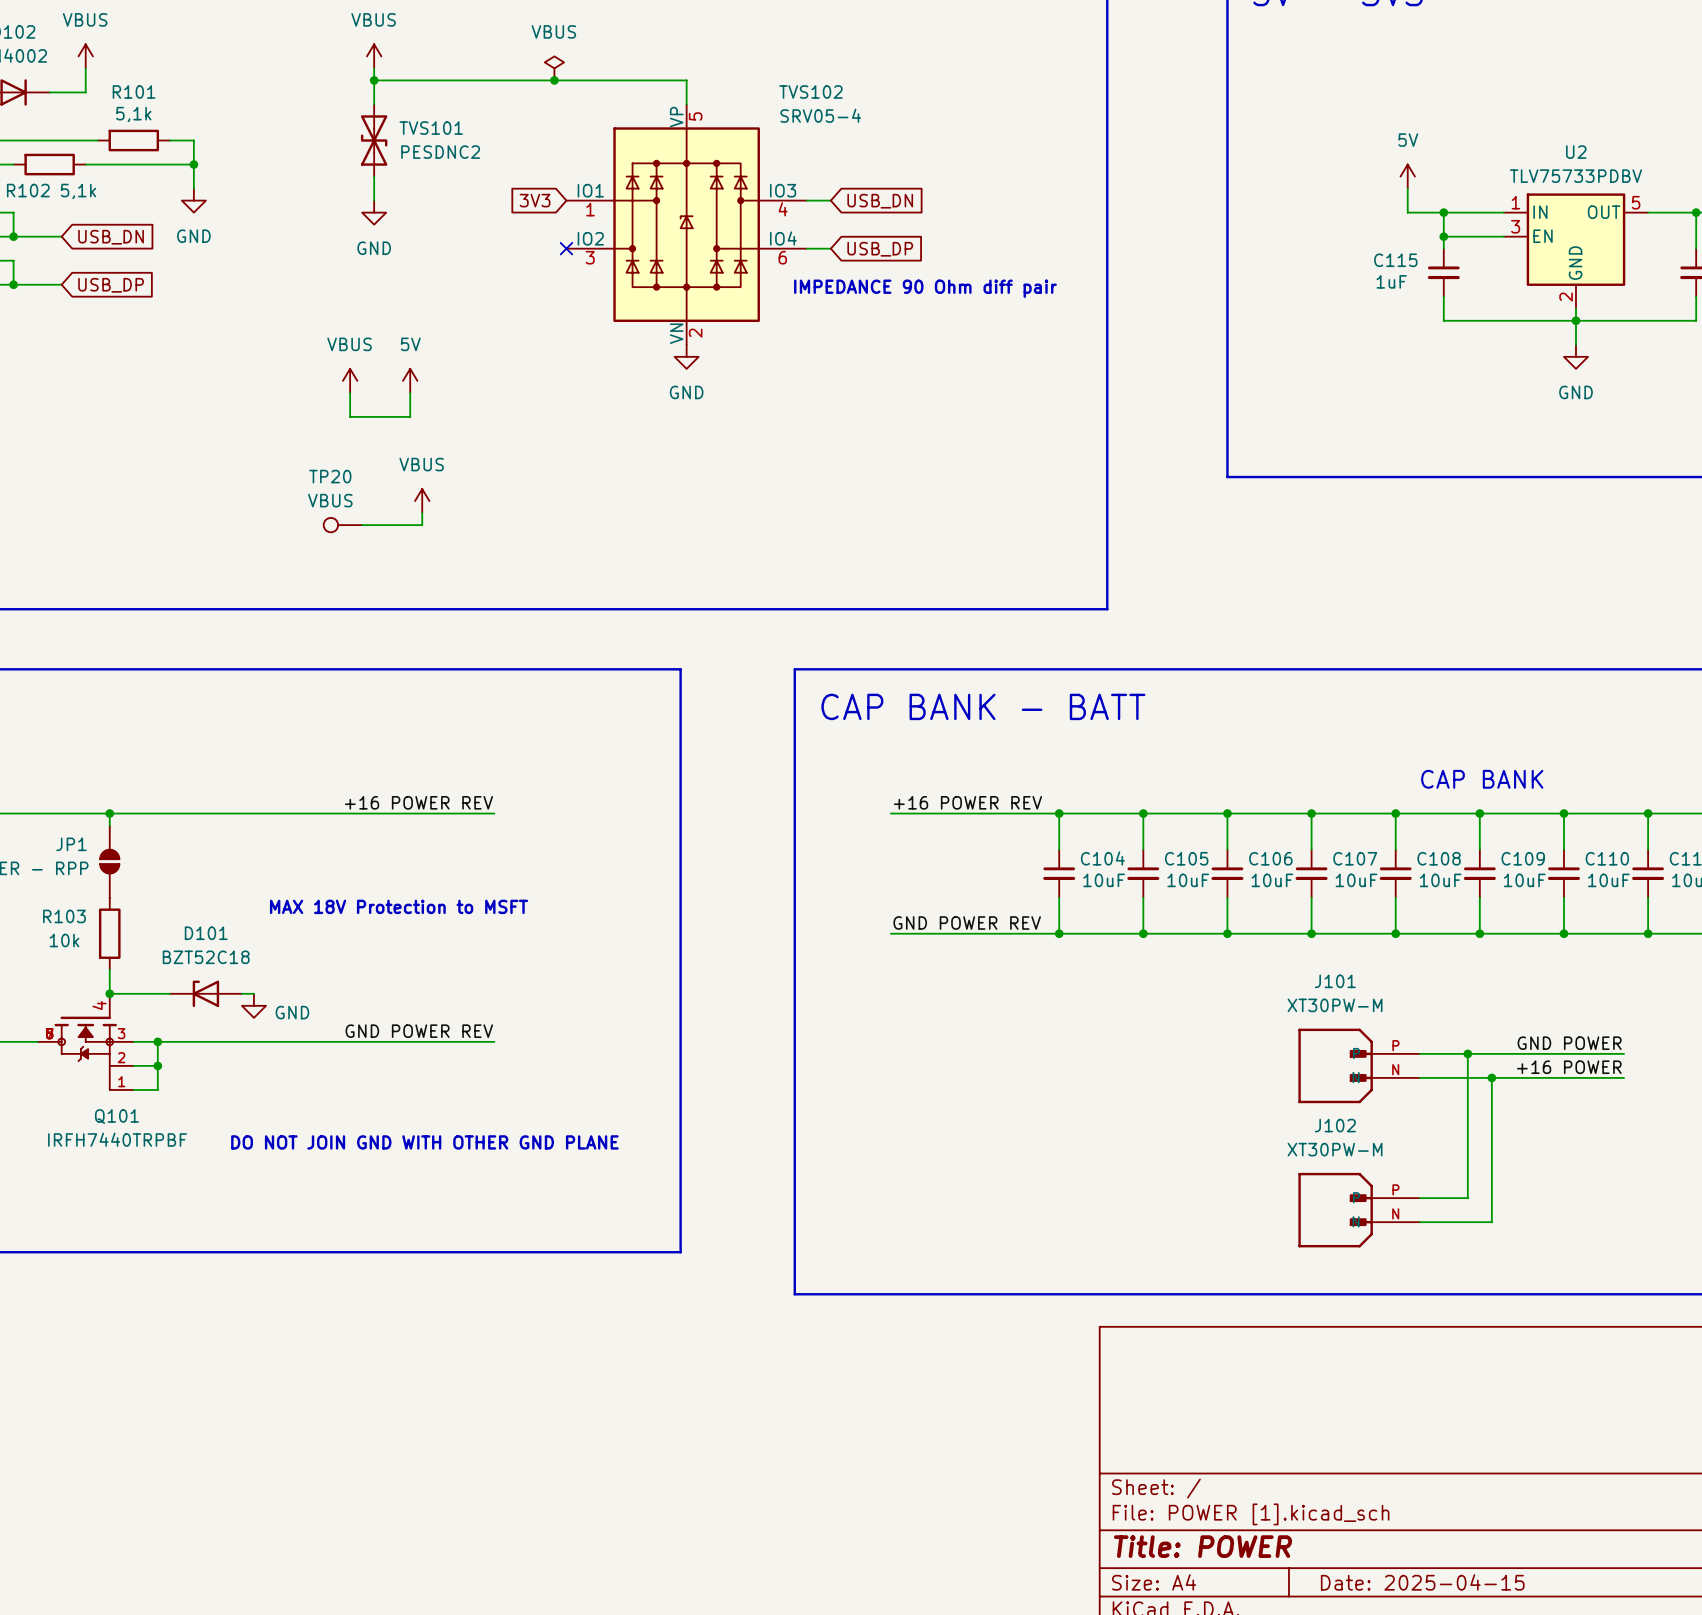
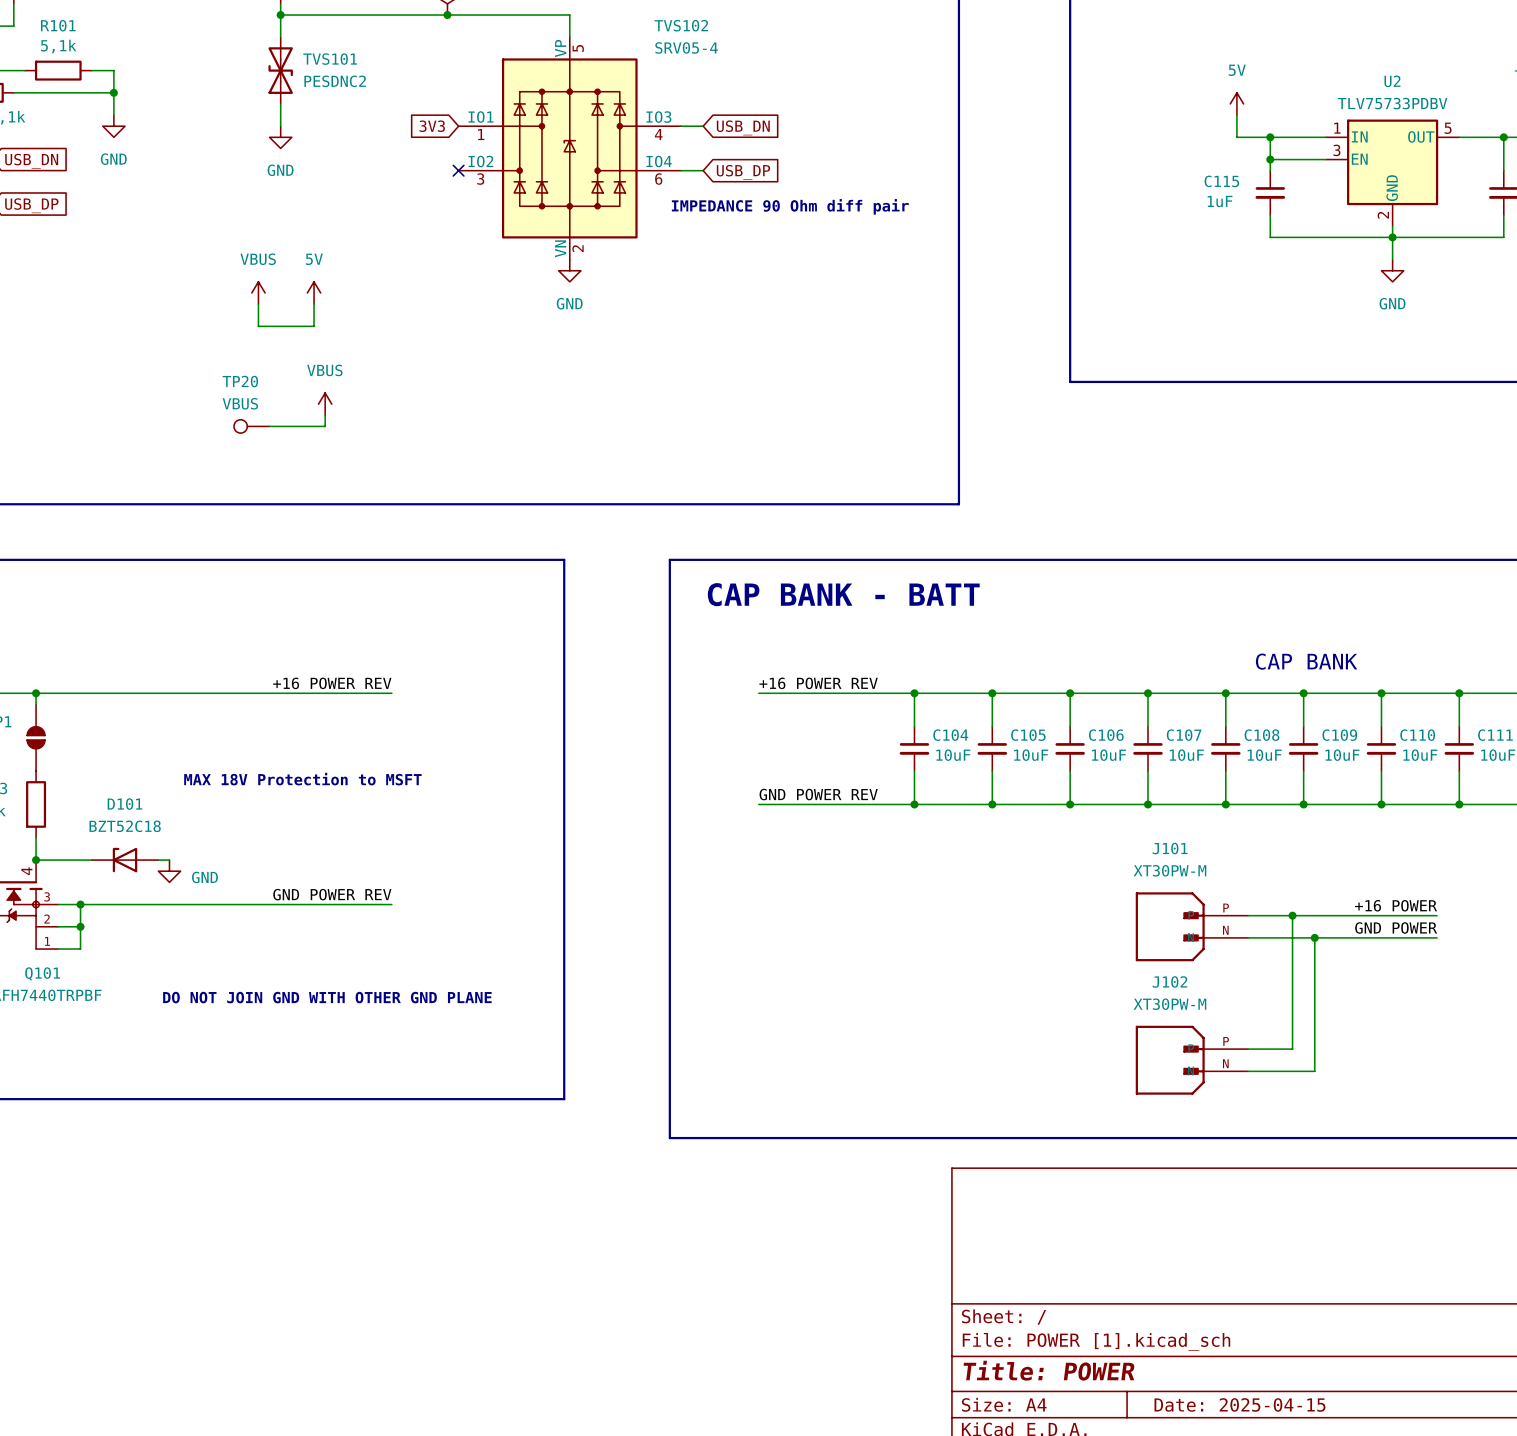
label: GND POWER (1569, 1043) -> +16 POWER (1396, 905)
label: +16 POWER (1569, 1067) -> GND POWER (1396, 927)

